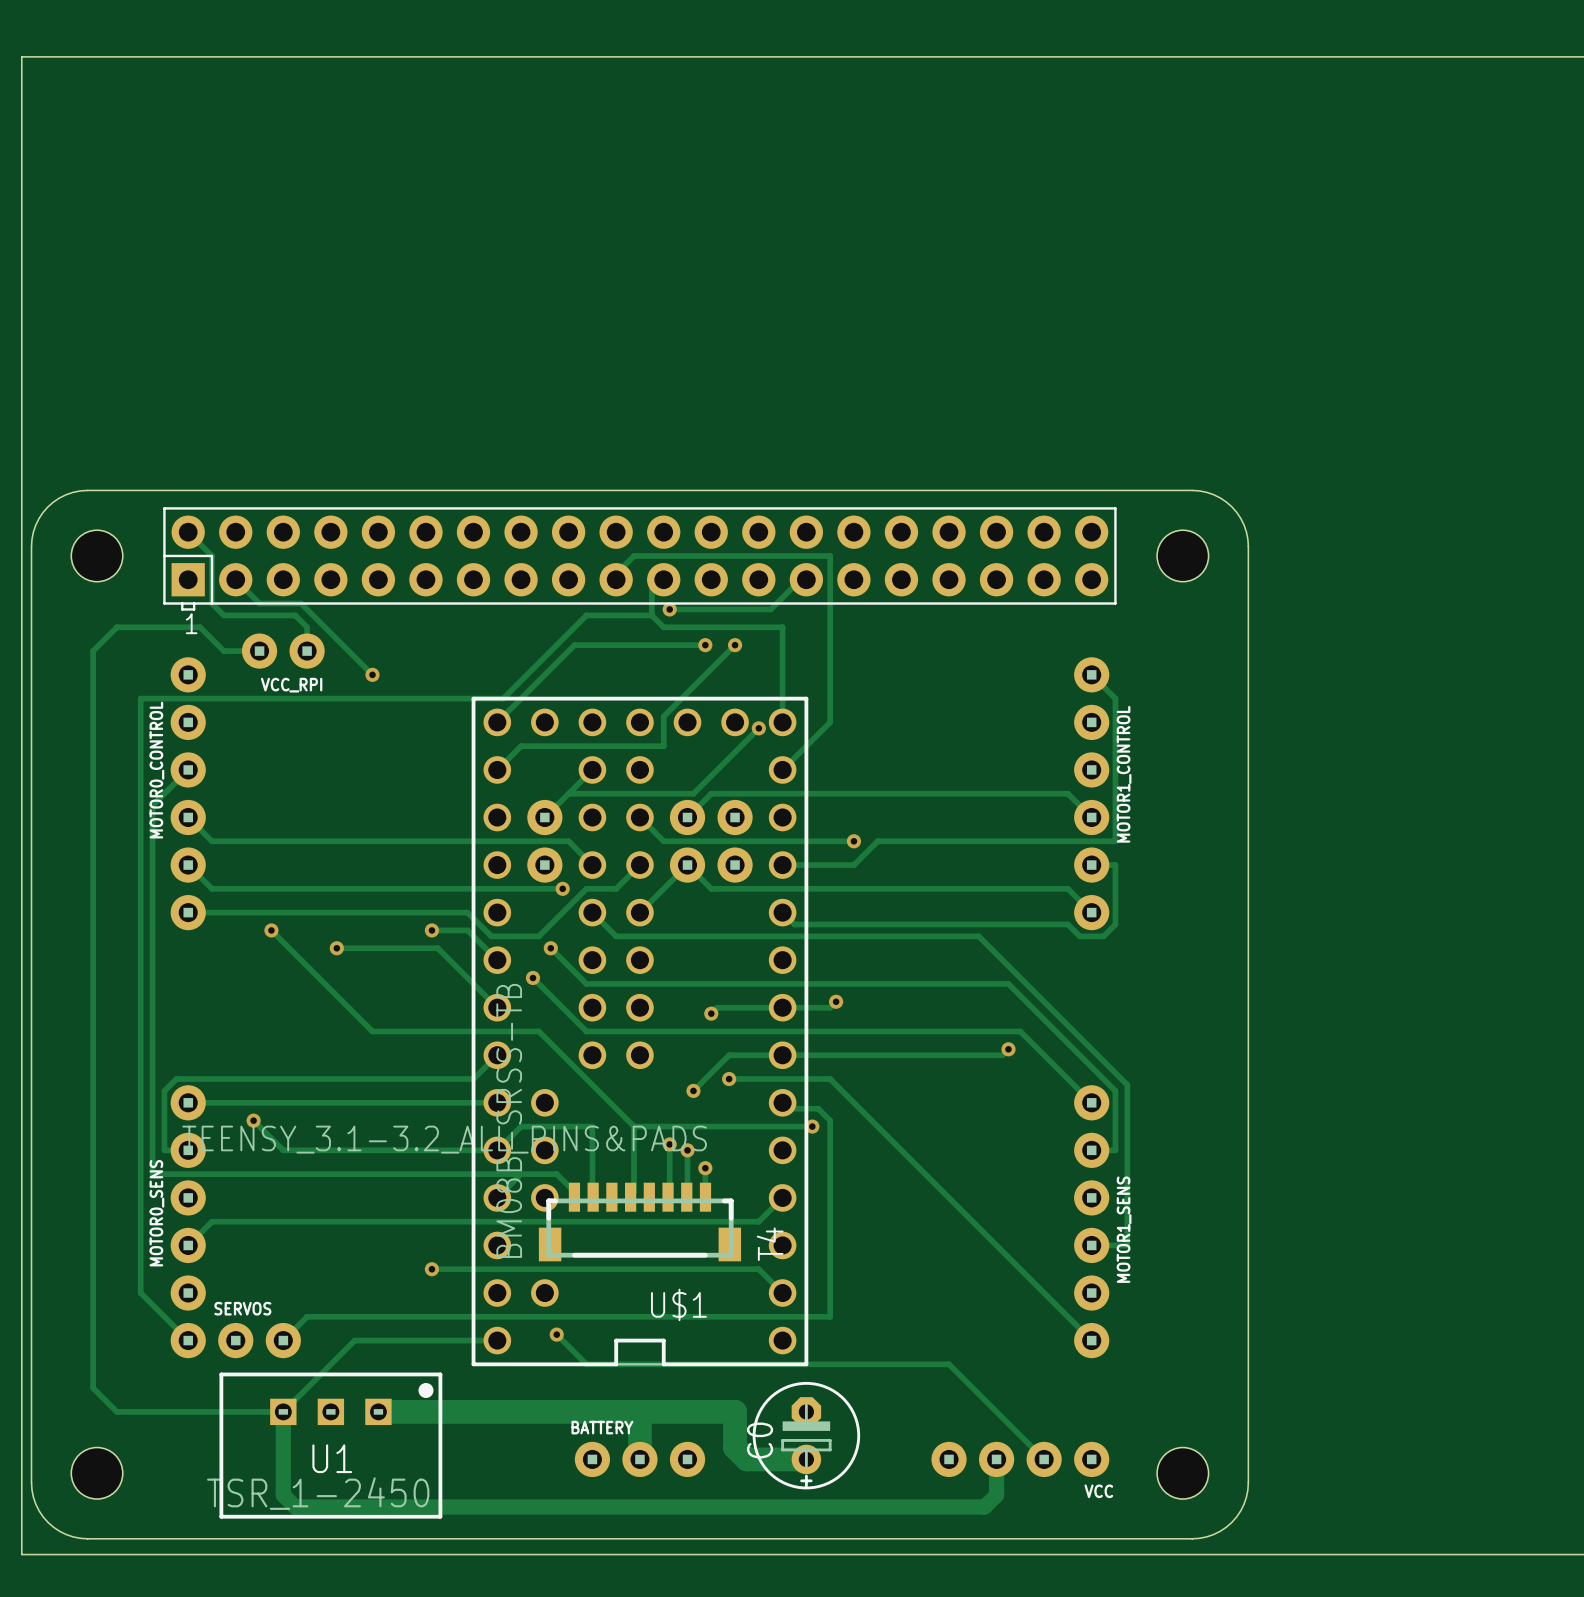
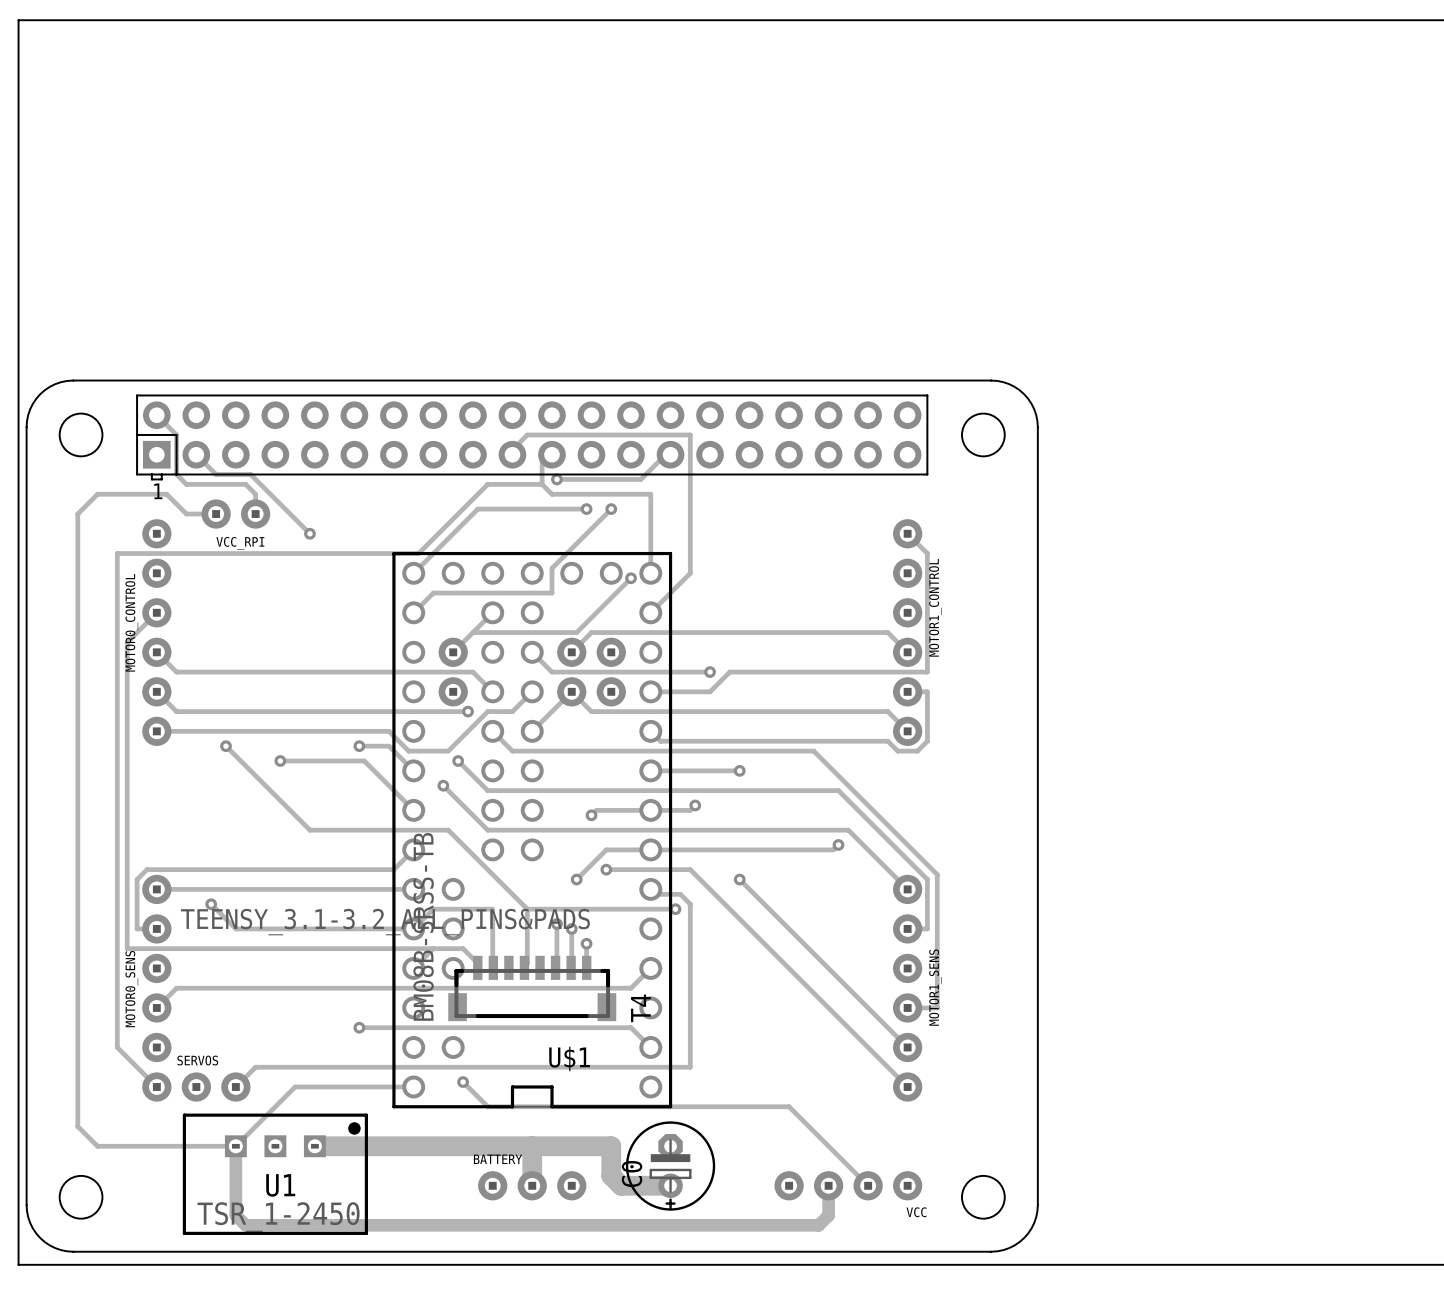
track: none -> (650, 770) (739, 770)
via: none -> (739, 770)
track: none -> (739, 879) (907, 1047)
via: none -> (739, 879)

